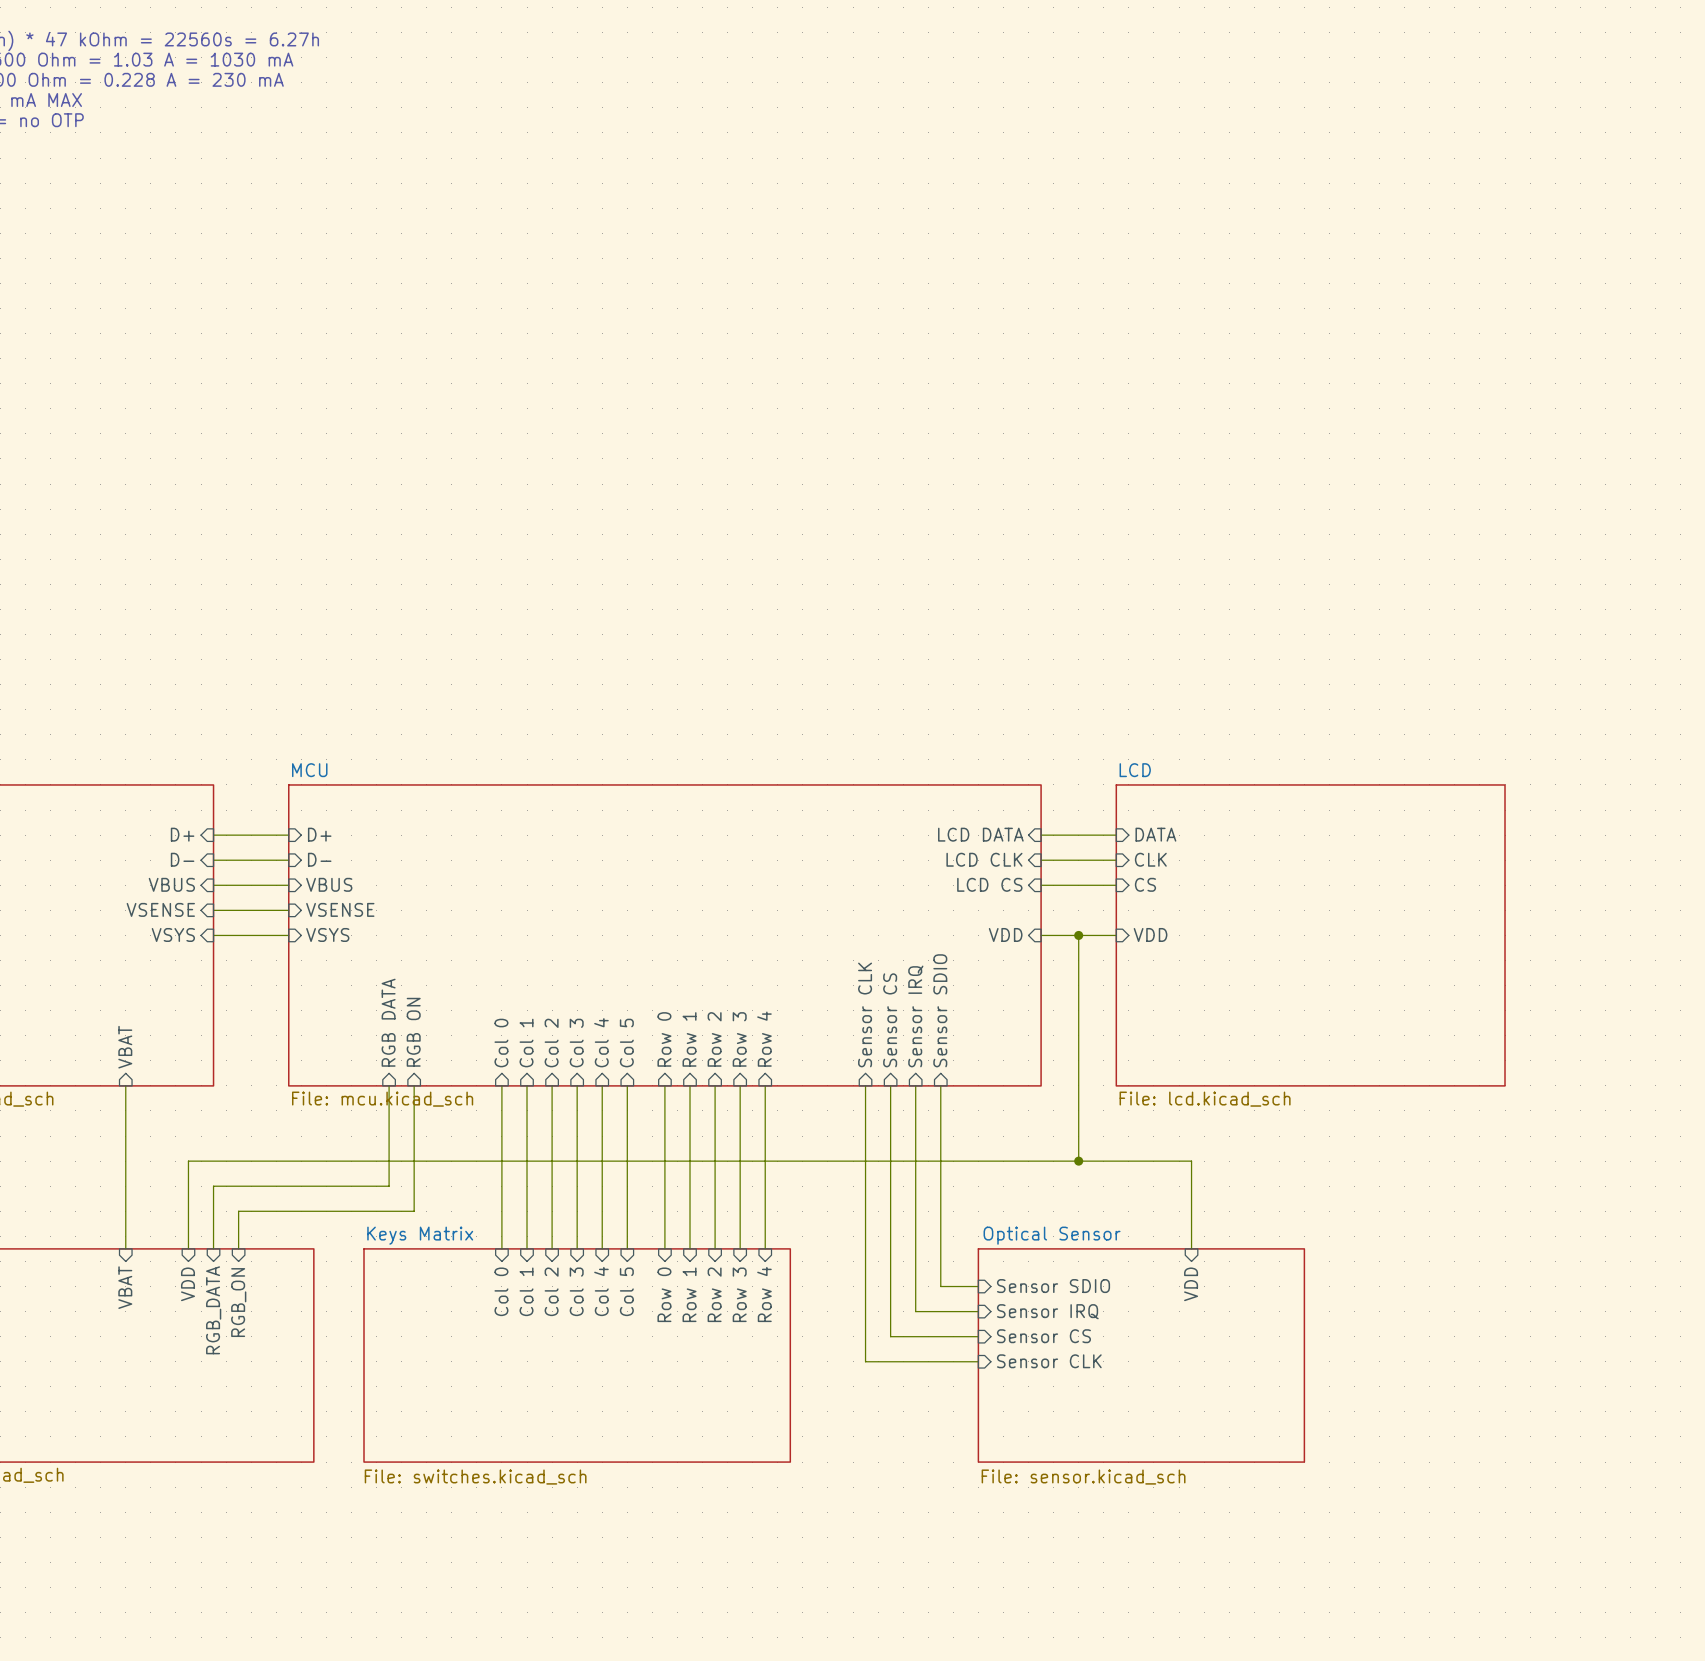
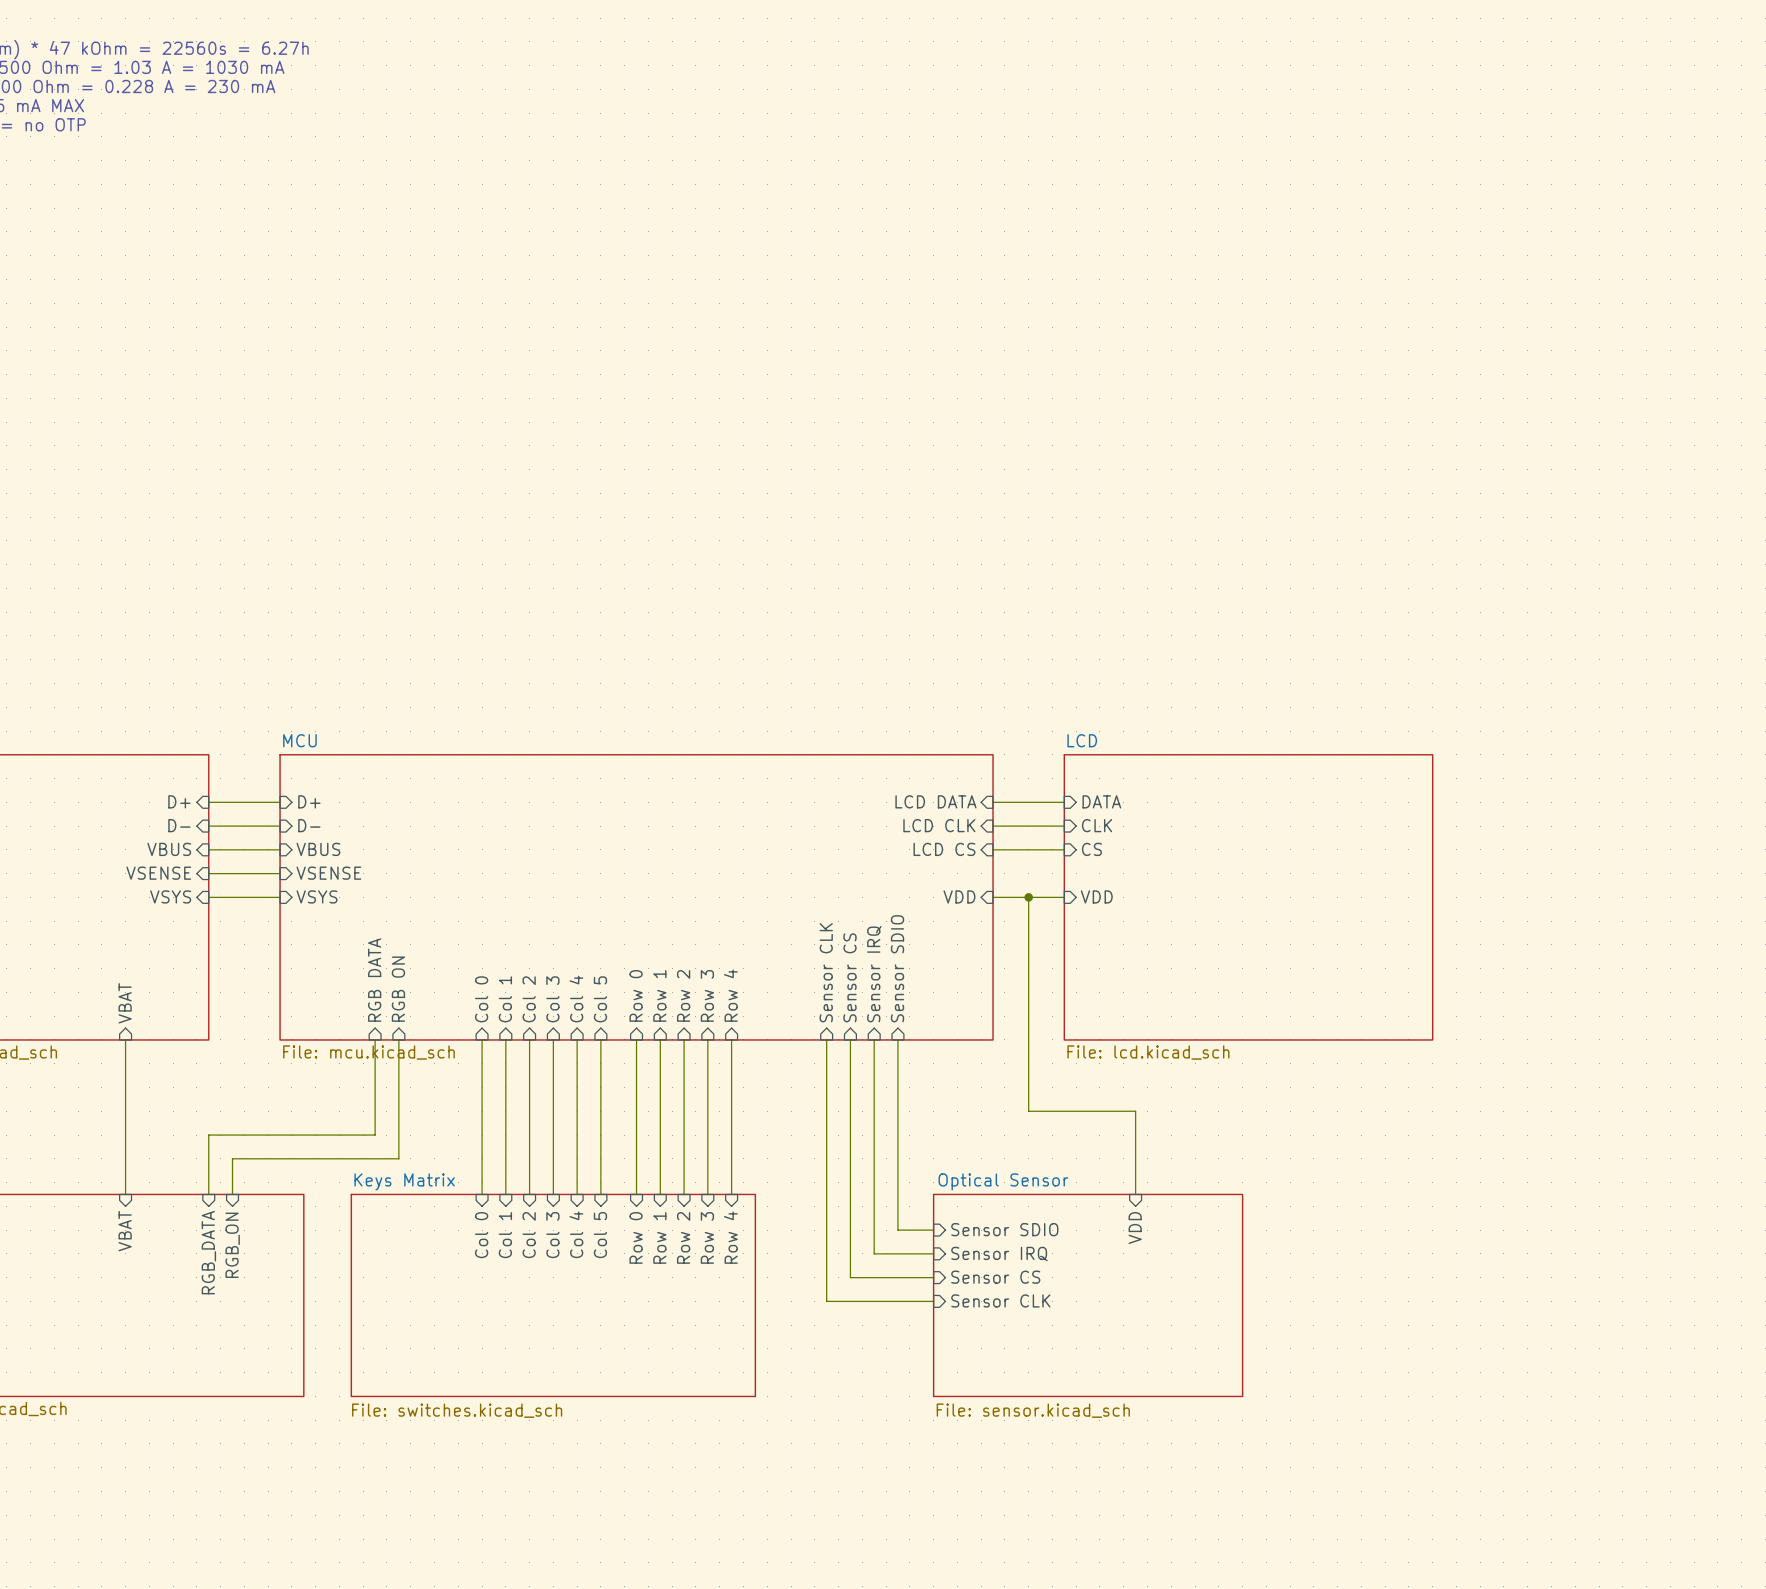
wire: (1078, 1161) (188, 1161) (188, 1248) -> none
junction: (1078, 1161) -> none
sheet pin: VDD (187, 1284) -> none

